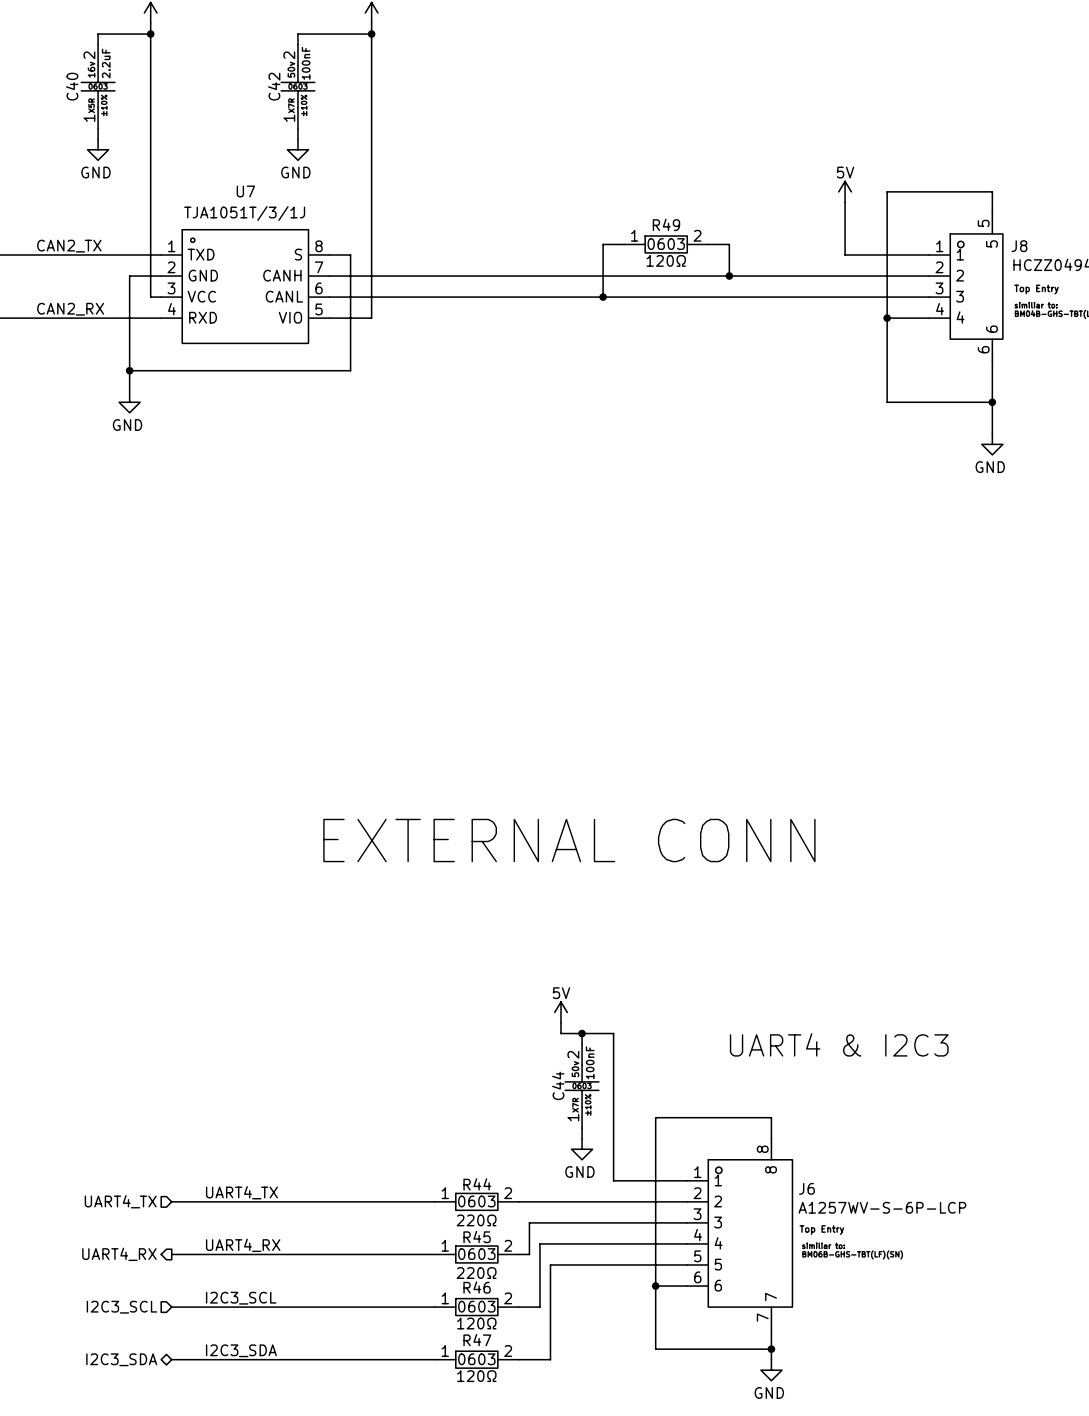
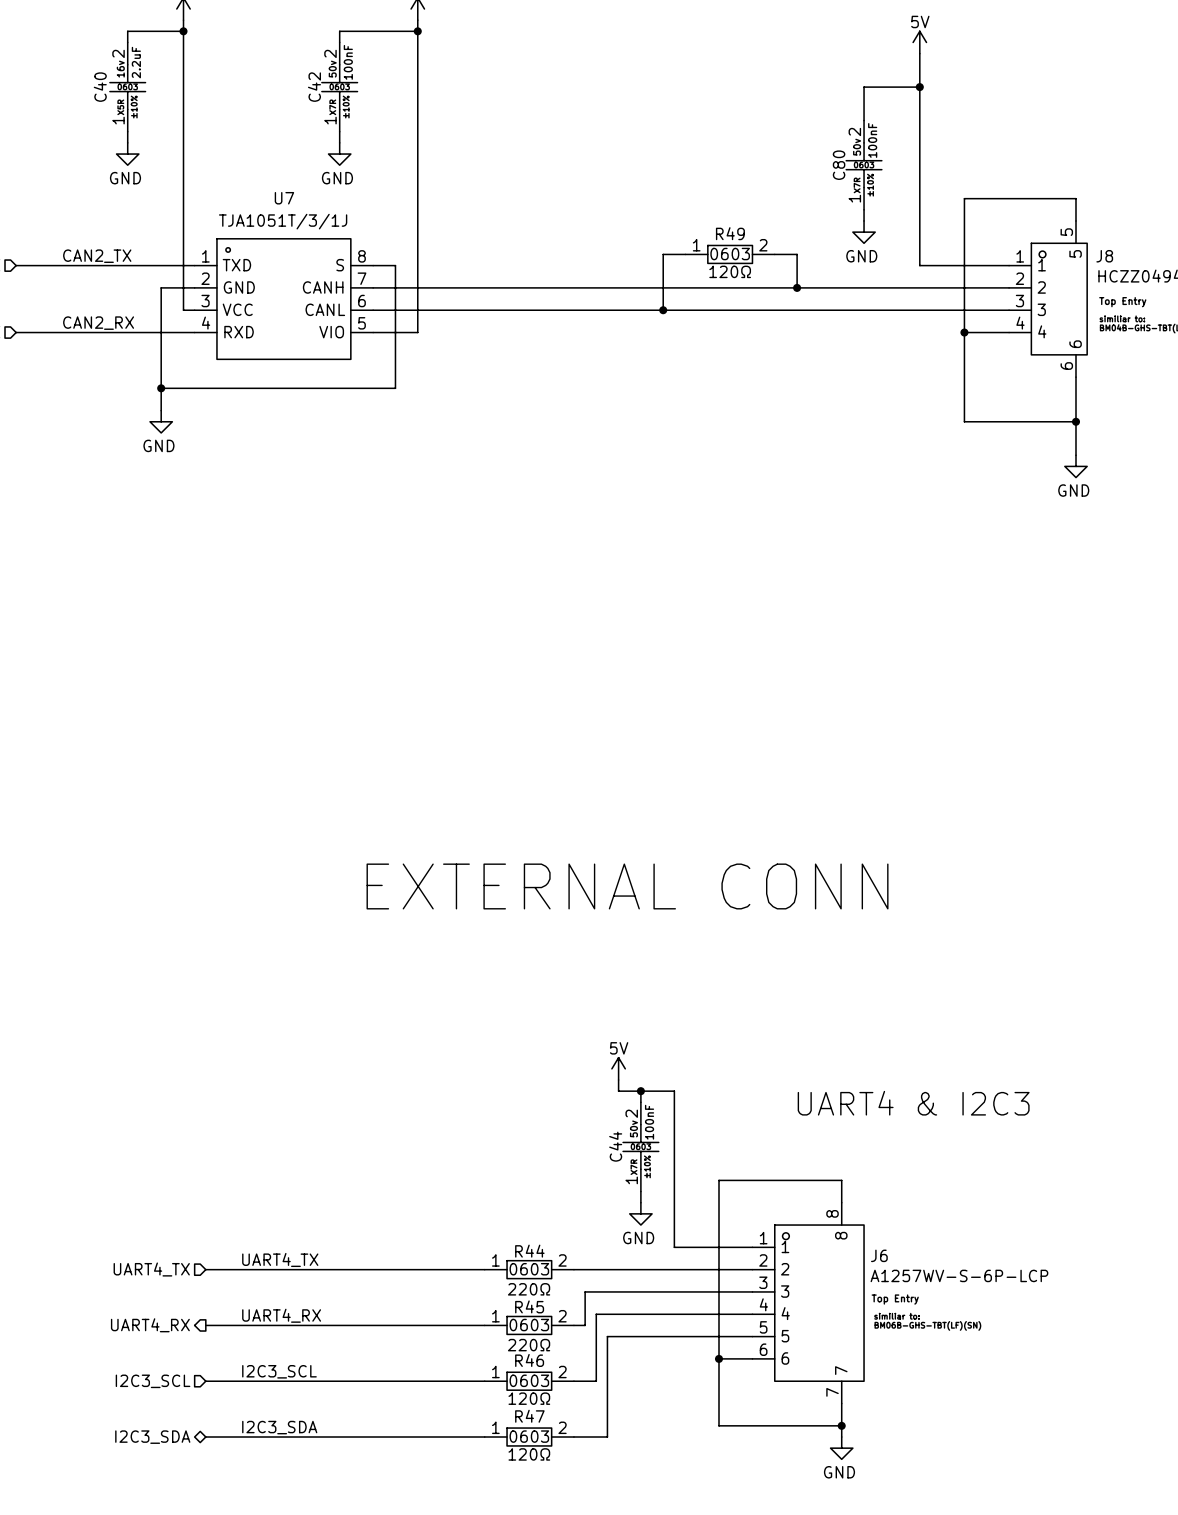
wire: none -> (919, 53) (919, 209)
wire: none -> (919, 87) (864, 87) (864, 120)
junction: none -> (919, 87)
C80: none -> (864, 165)
power symbol position: 5V (845, 191) -> 5V (919, 42)
wire: none -> (864, 209) (864, 220)
power symbol: none -> GND (864, 232)

